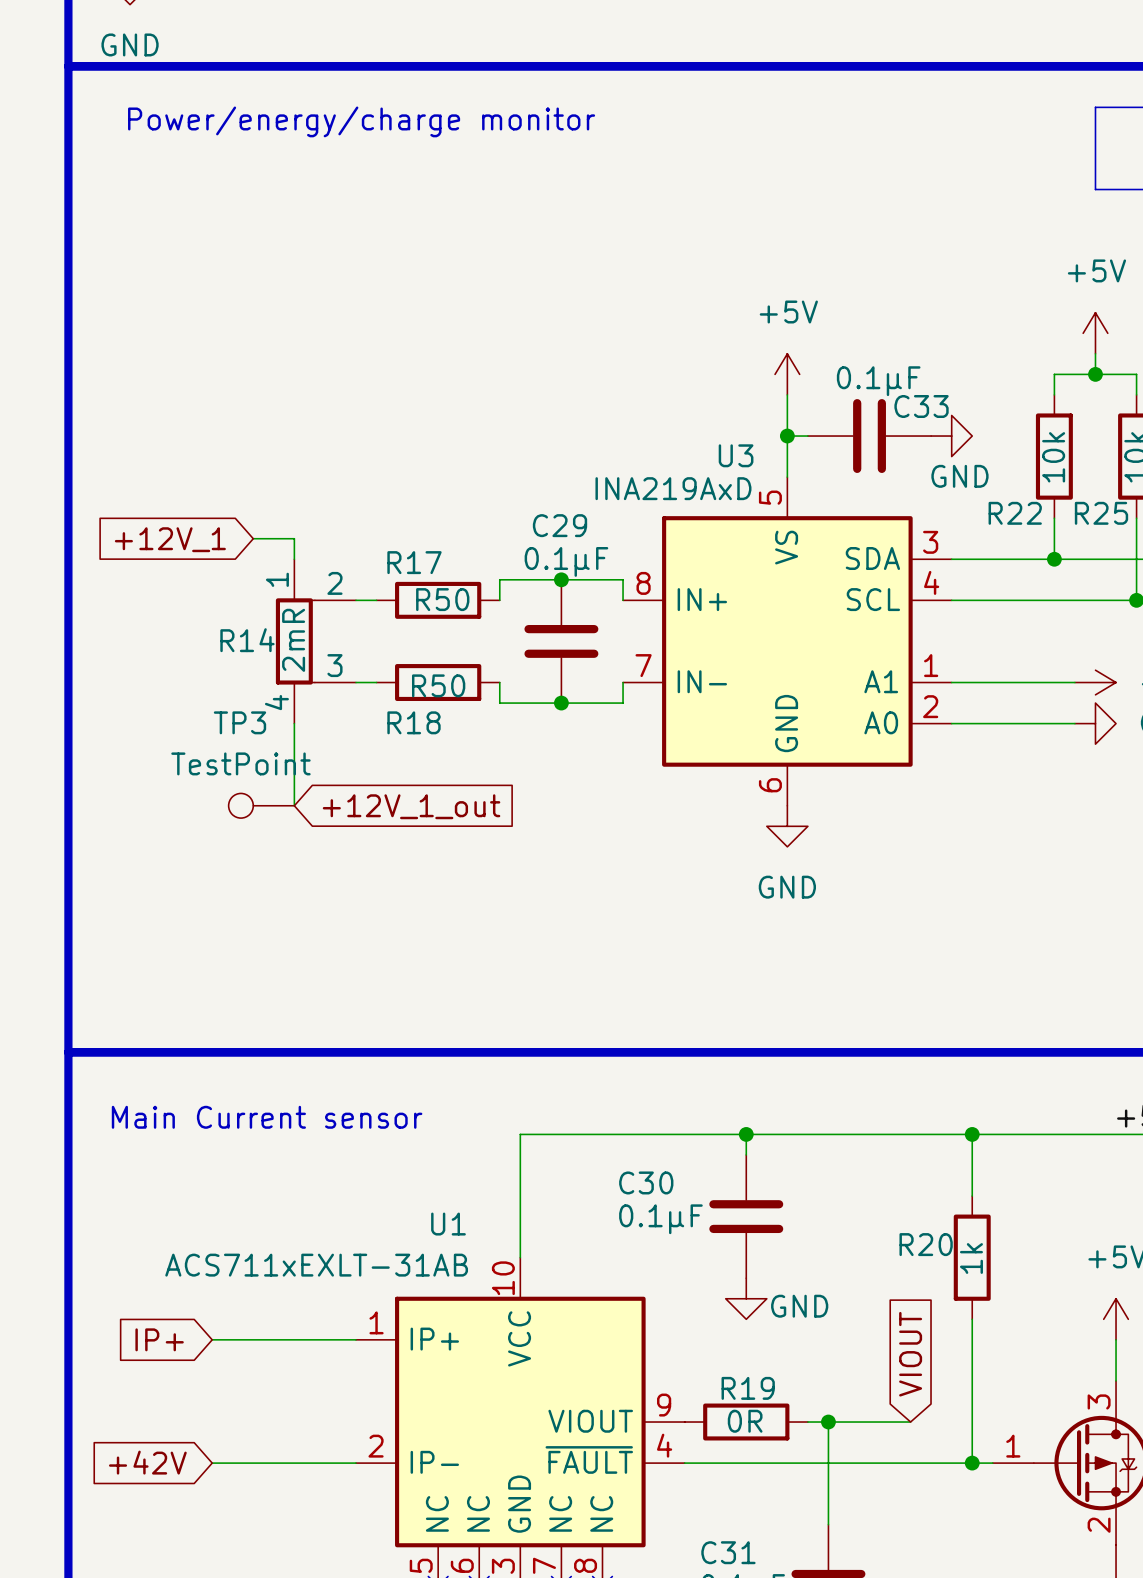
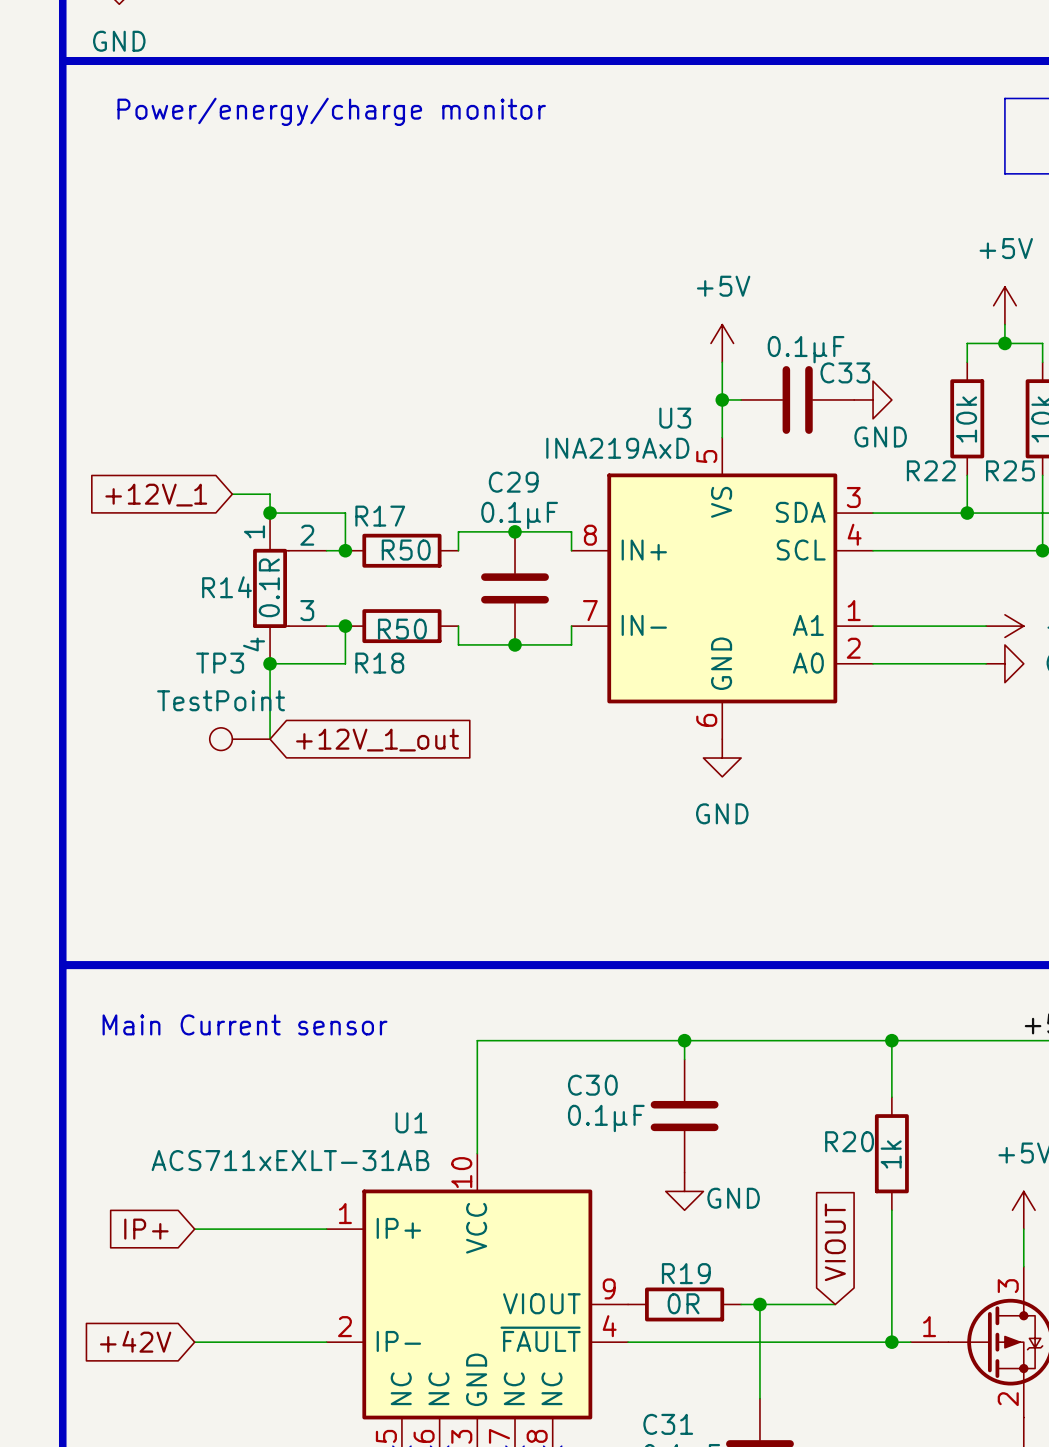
wire: none -> (270, 513) (345, 513) (345, 550)
junction: none -> (270, 513)
junction: none -> (345, 550)
R14 value: 2mR (293, 640) -> 0.1R (269, 587)
wire: none -> (345, 626) (345, 663) (270, 663)
junction: none -> (345, 626)
junction: none -> (270, 663)

